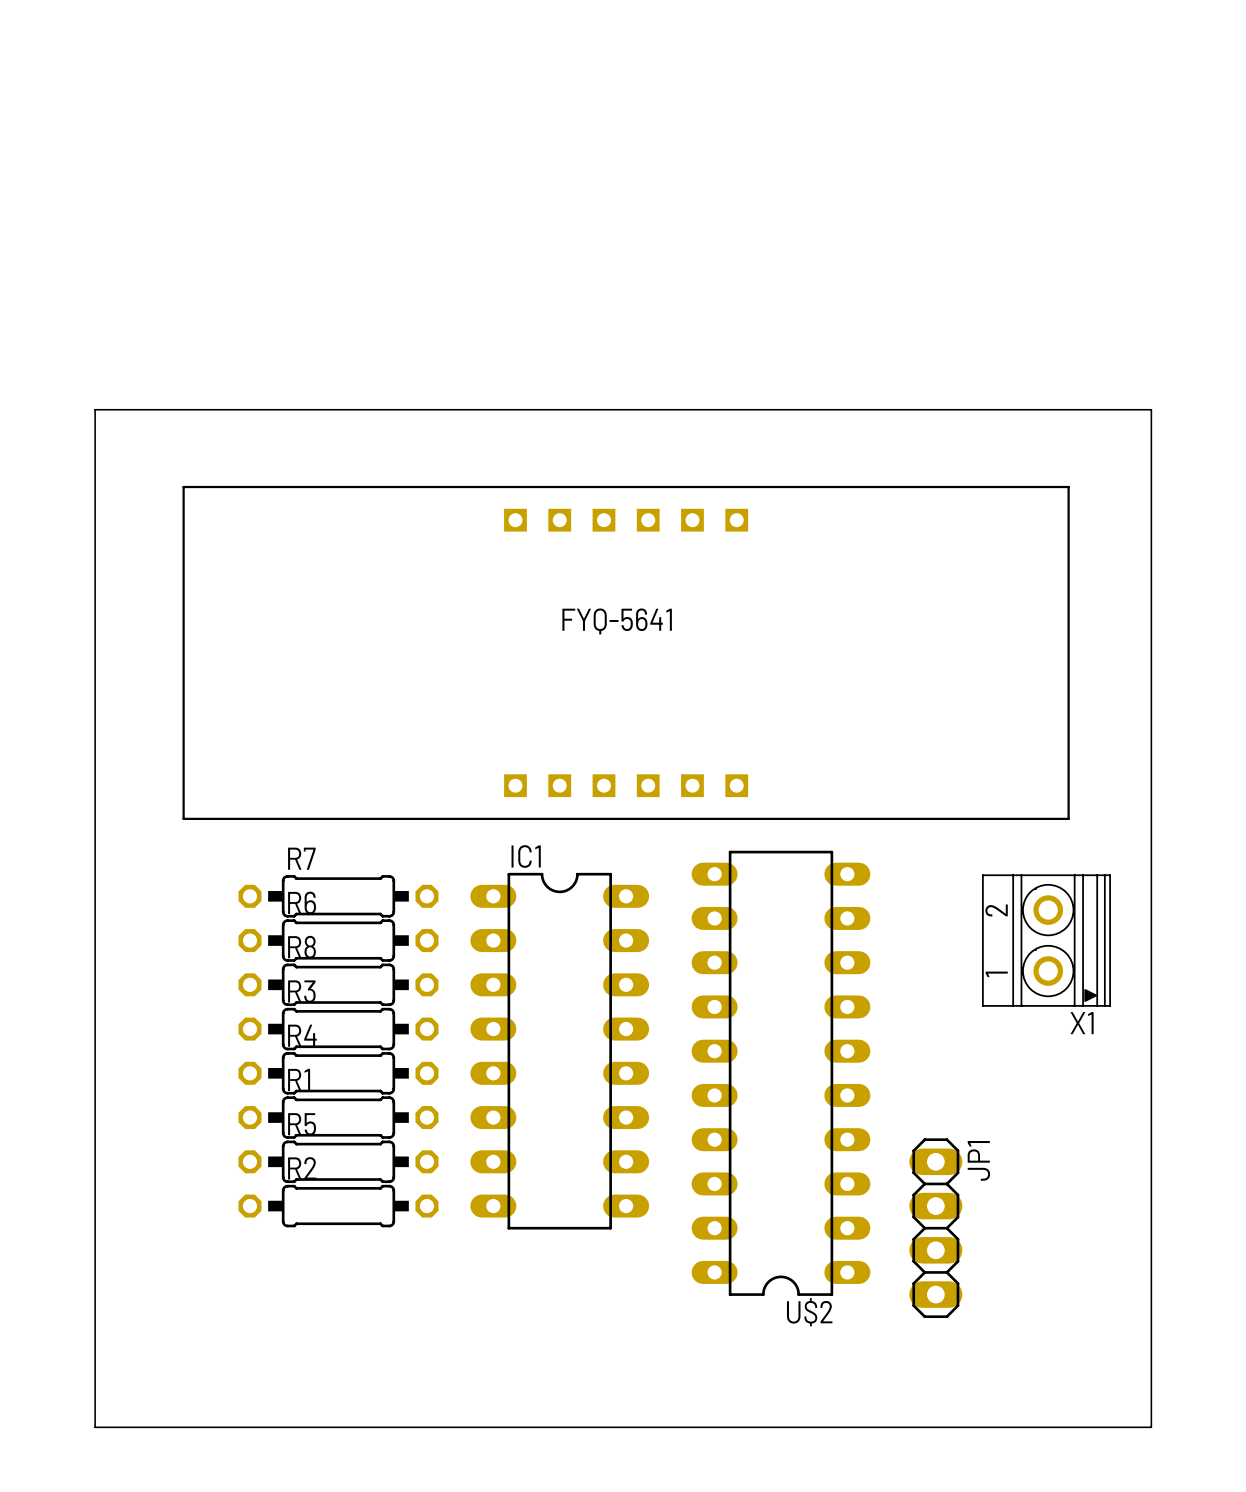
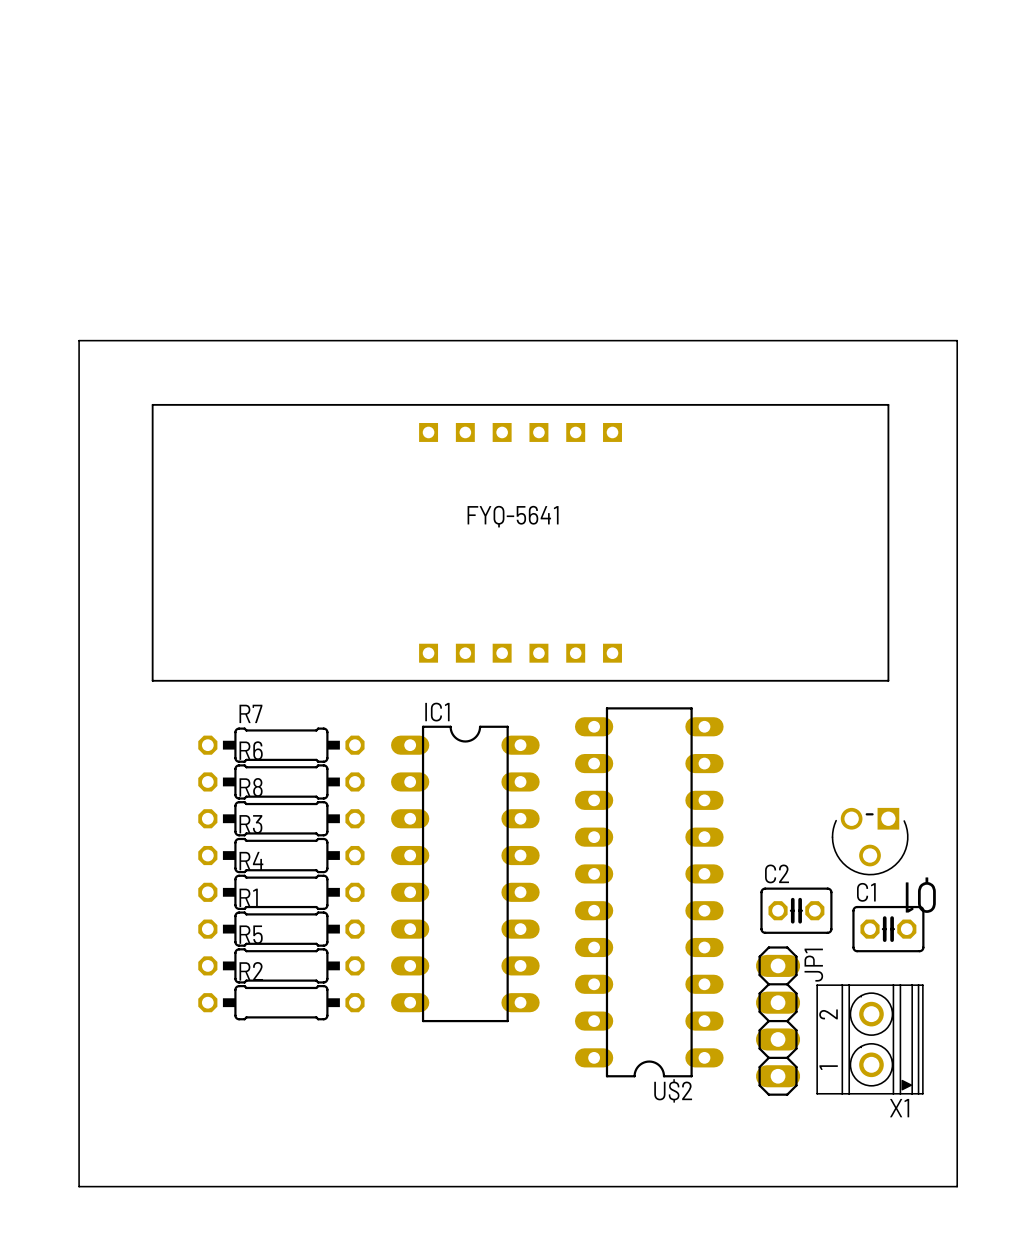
X1 position: (1046, 940) -> (870, 1039)
Q1: none -> (870, 841)
C2: none -> (796, 910)
C1: none -> (888, 929)

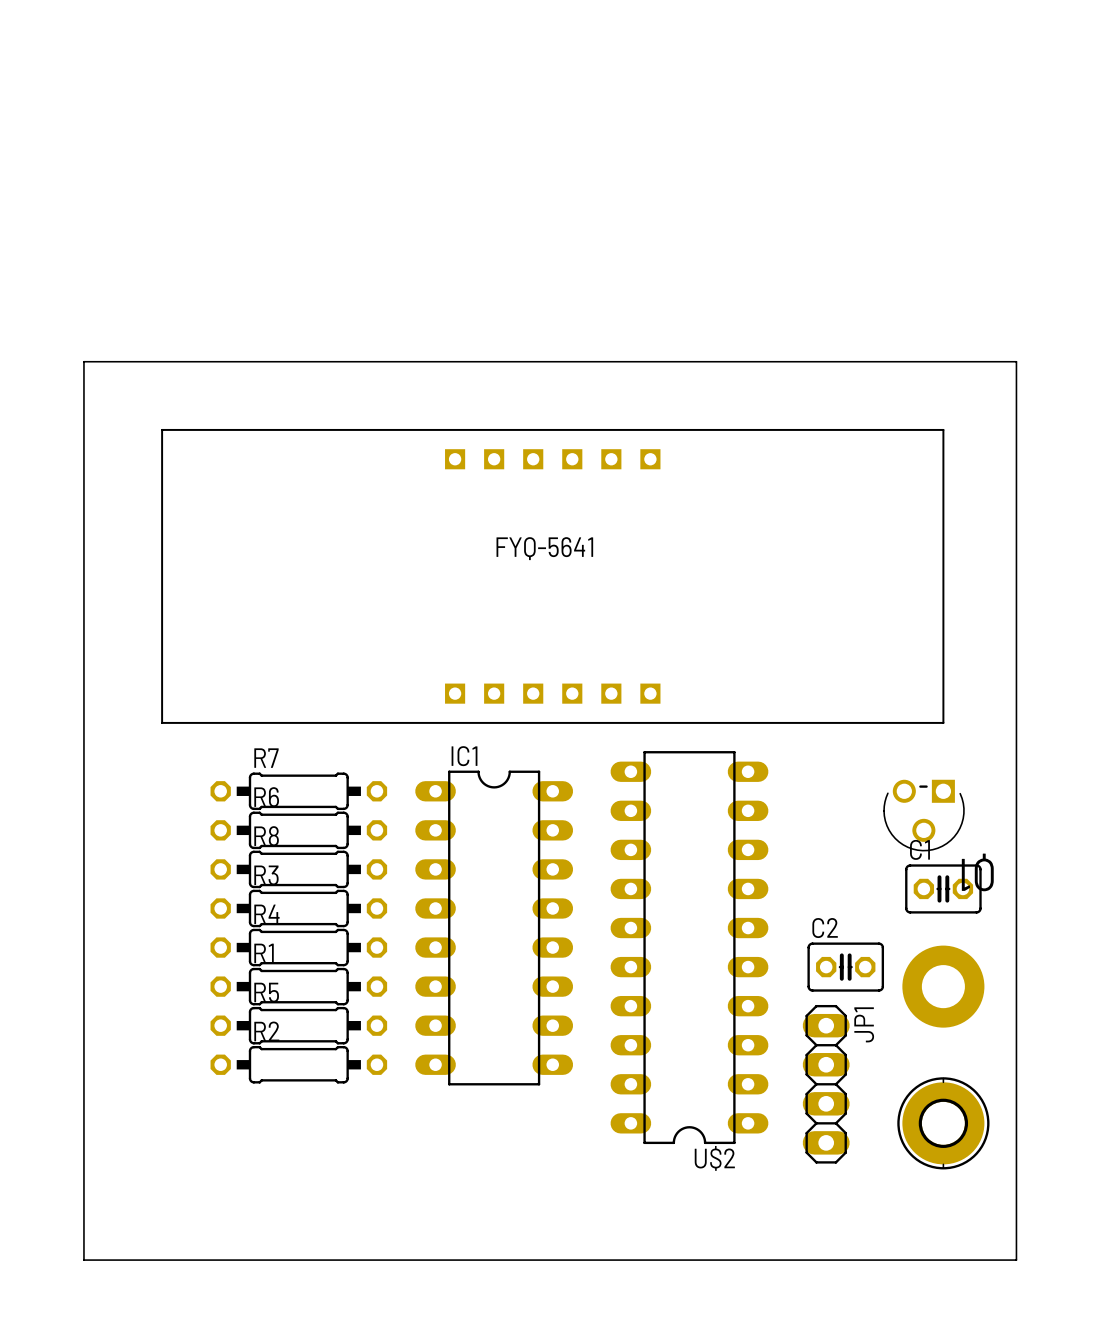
Q1 position: (870, 841) -> (923, 815)
C1 position: (888, 929) -> (943, 888)
part: none -> (943, 986)
X1: (870, 1039) -> none
part: none -> (943, 1123)

